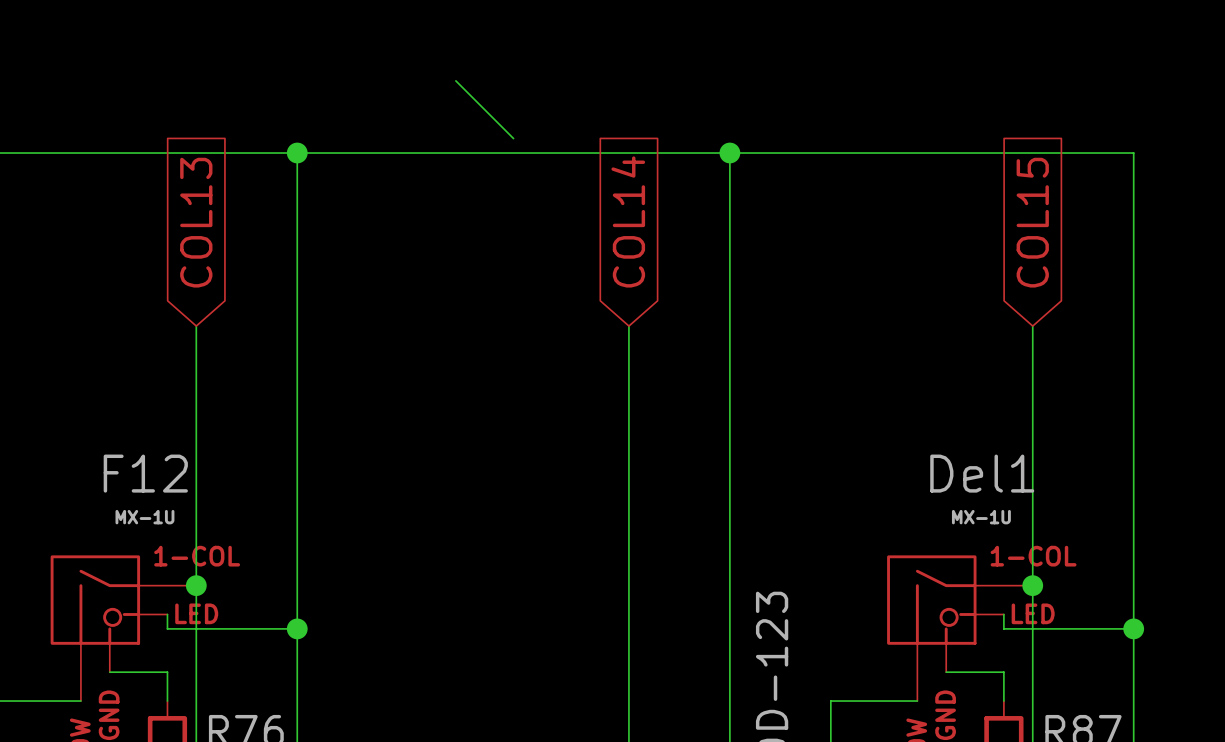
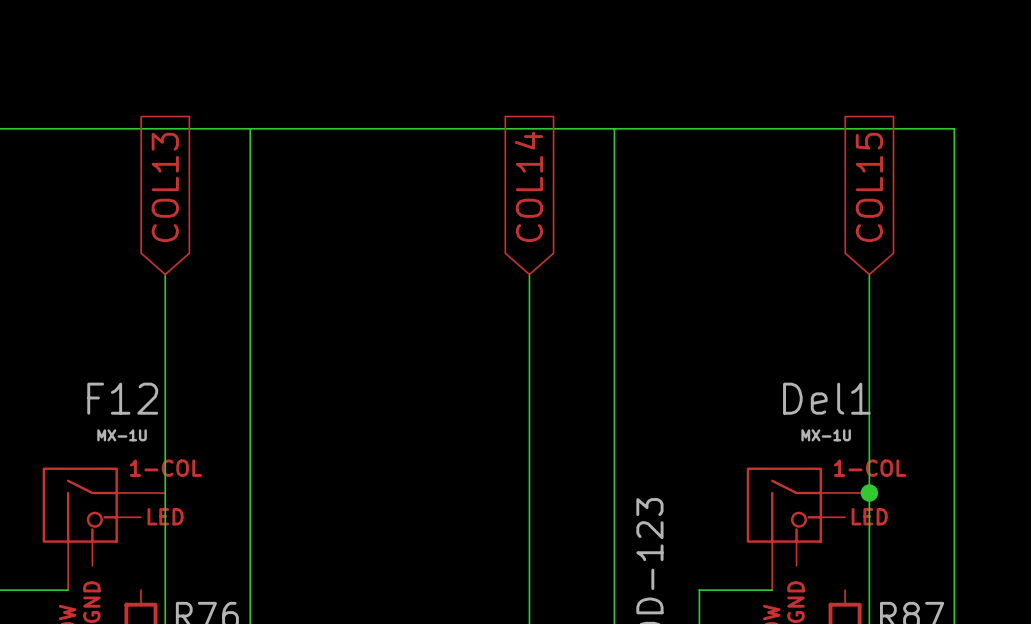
wire: (455, 80) (513, 138) -> none
junction: (297, 153) -> none
junction: (729, 153) -> none
junction: (196, 585) -> none
wire: (167, 614) (167, 628) (297, 628) -> none
wire: (1003, 614) (1003, 628) (1133, 628) -> none
junction: (297, 628) -> none
junction: (1133, 628) -> none
wire: (109, 672) (167, 672) (167, 701) -> none
wire: (946, 672) (1003, 672) (1003, 701) -> none

